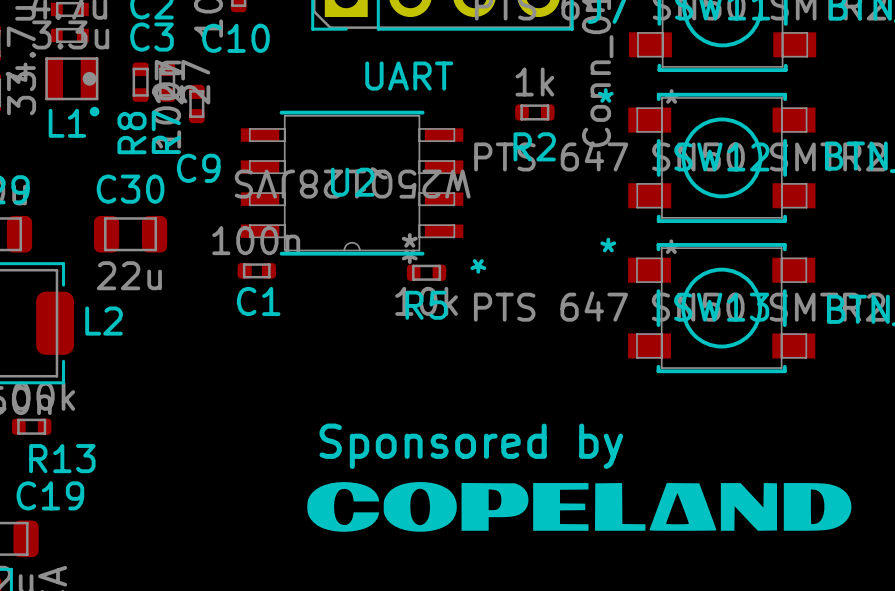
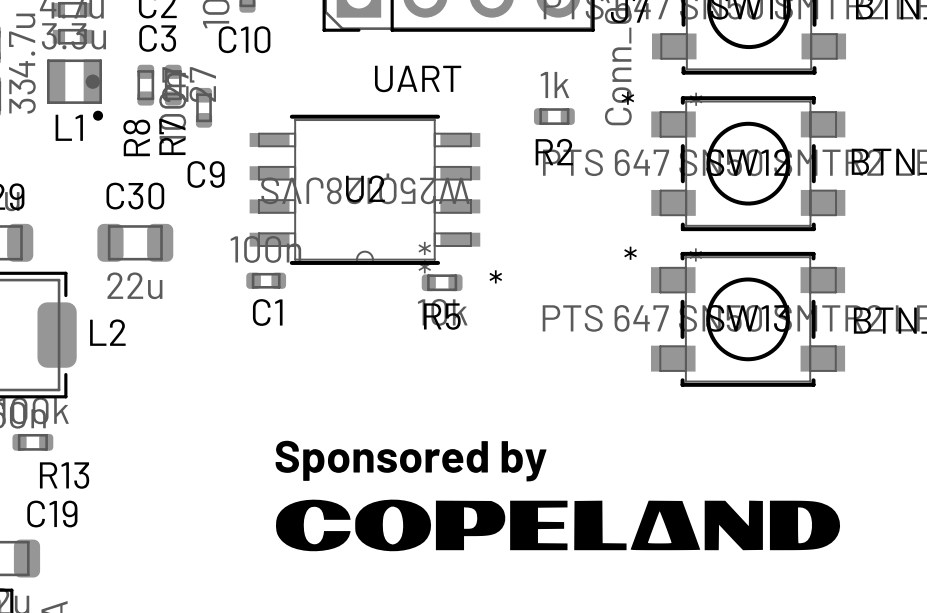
text position: Sponsored by (471, 446) -> Sponsored by (411, 461)
drawing position: (579, 506) -> (558, 525)

